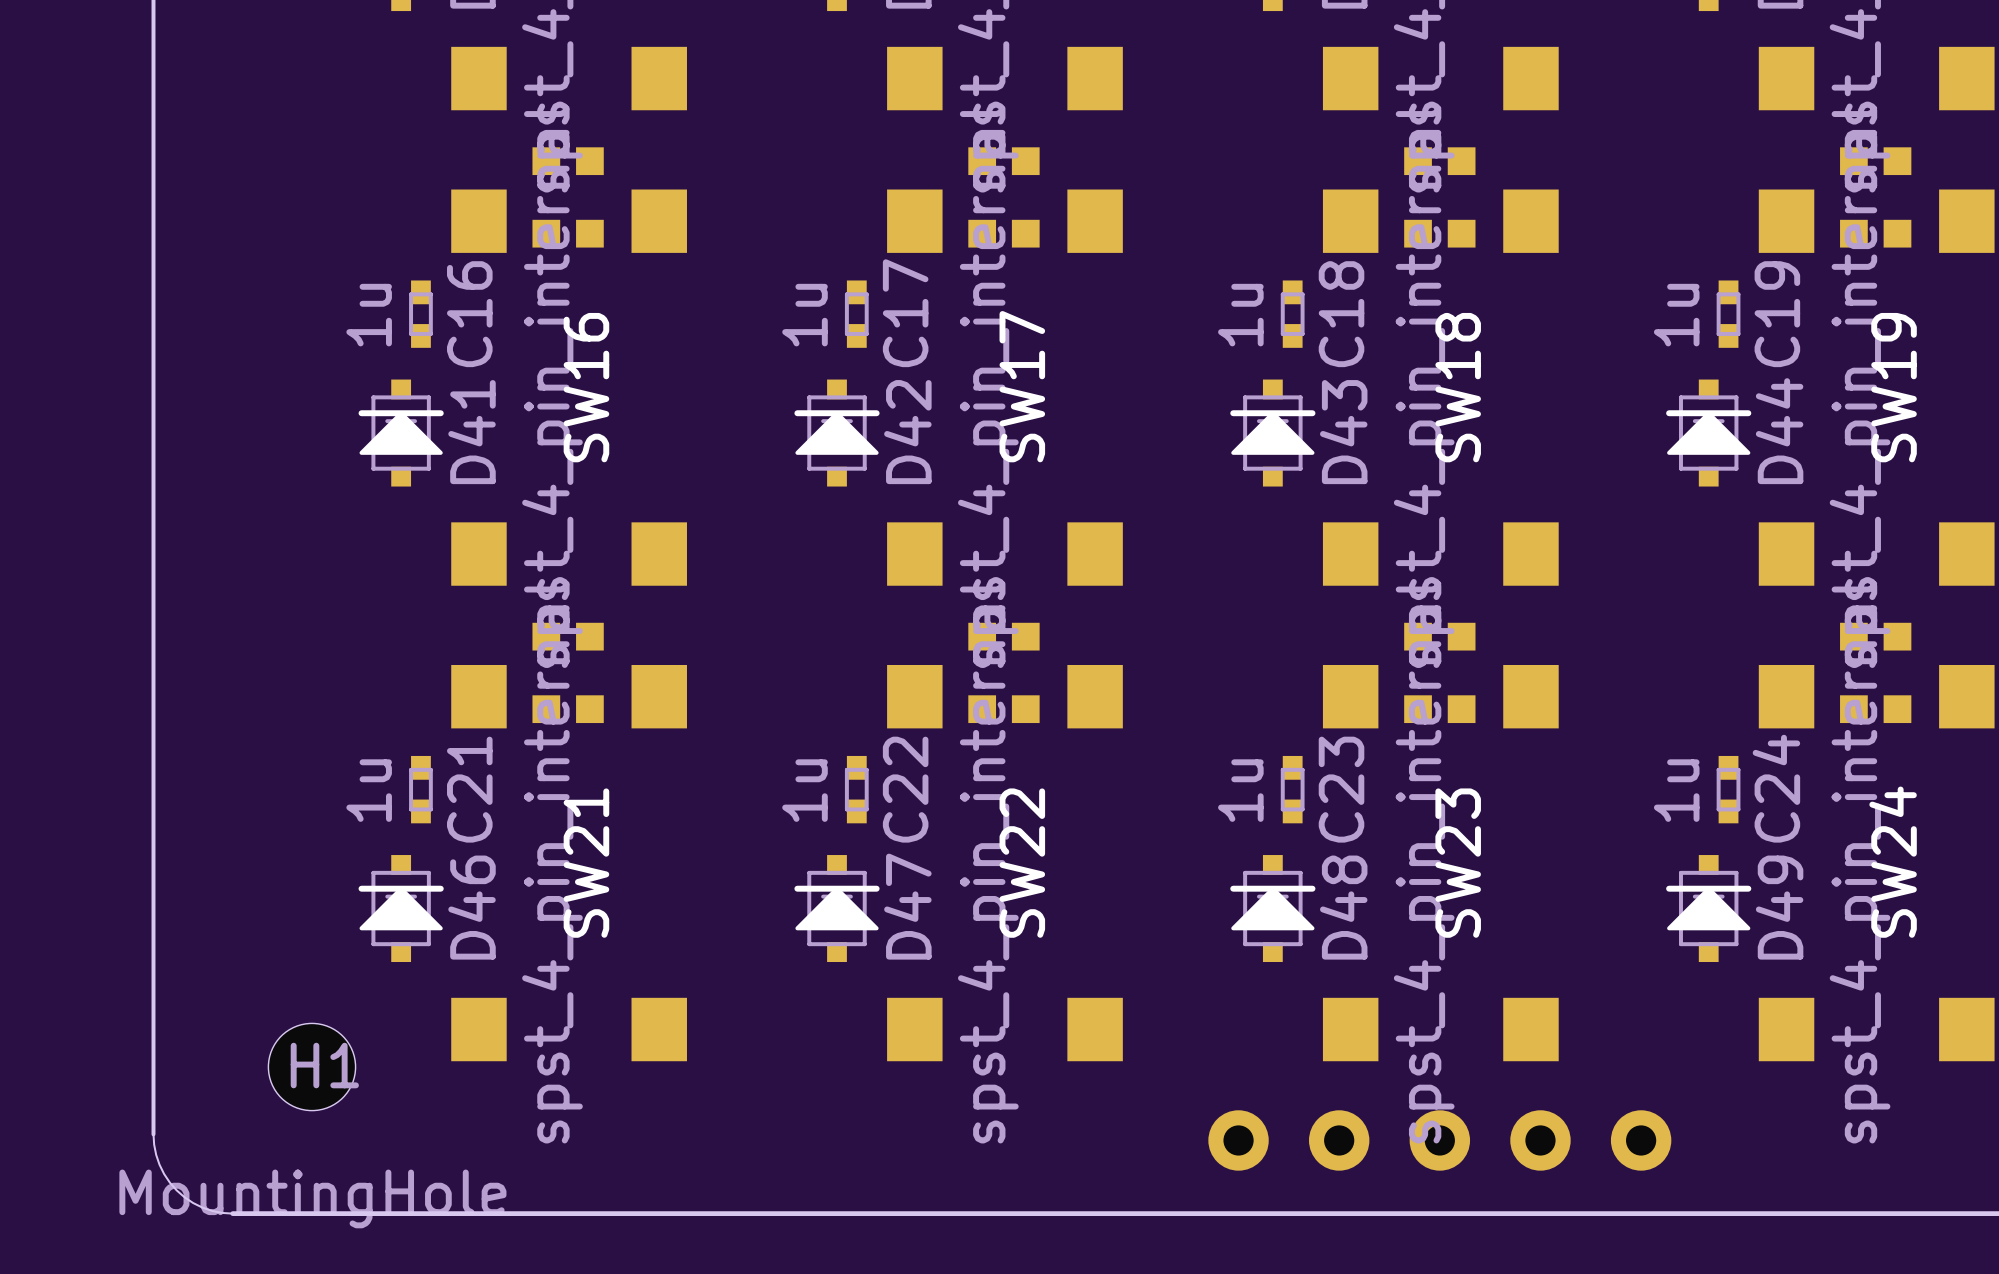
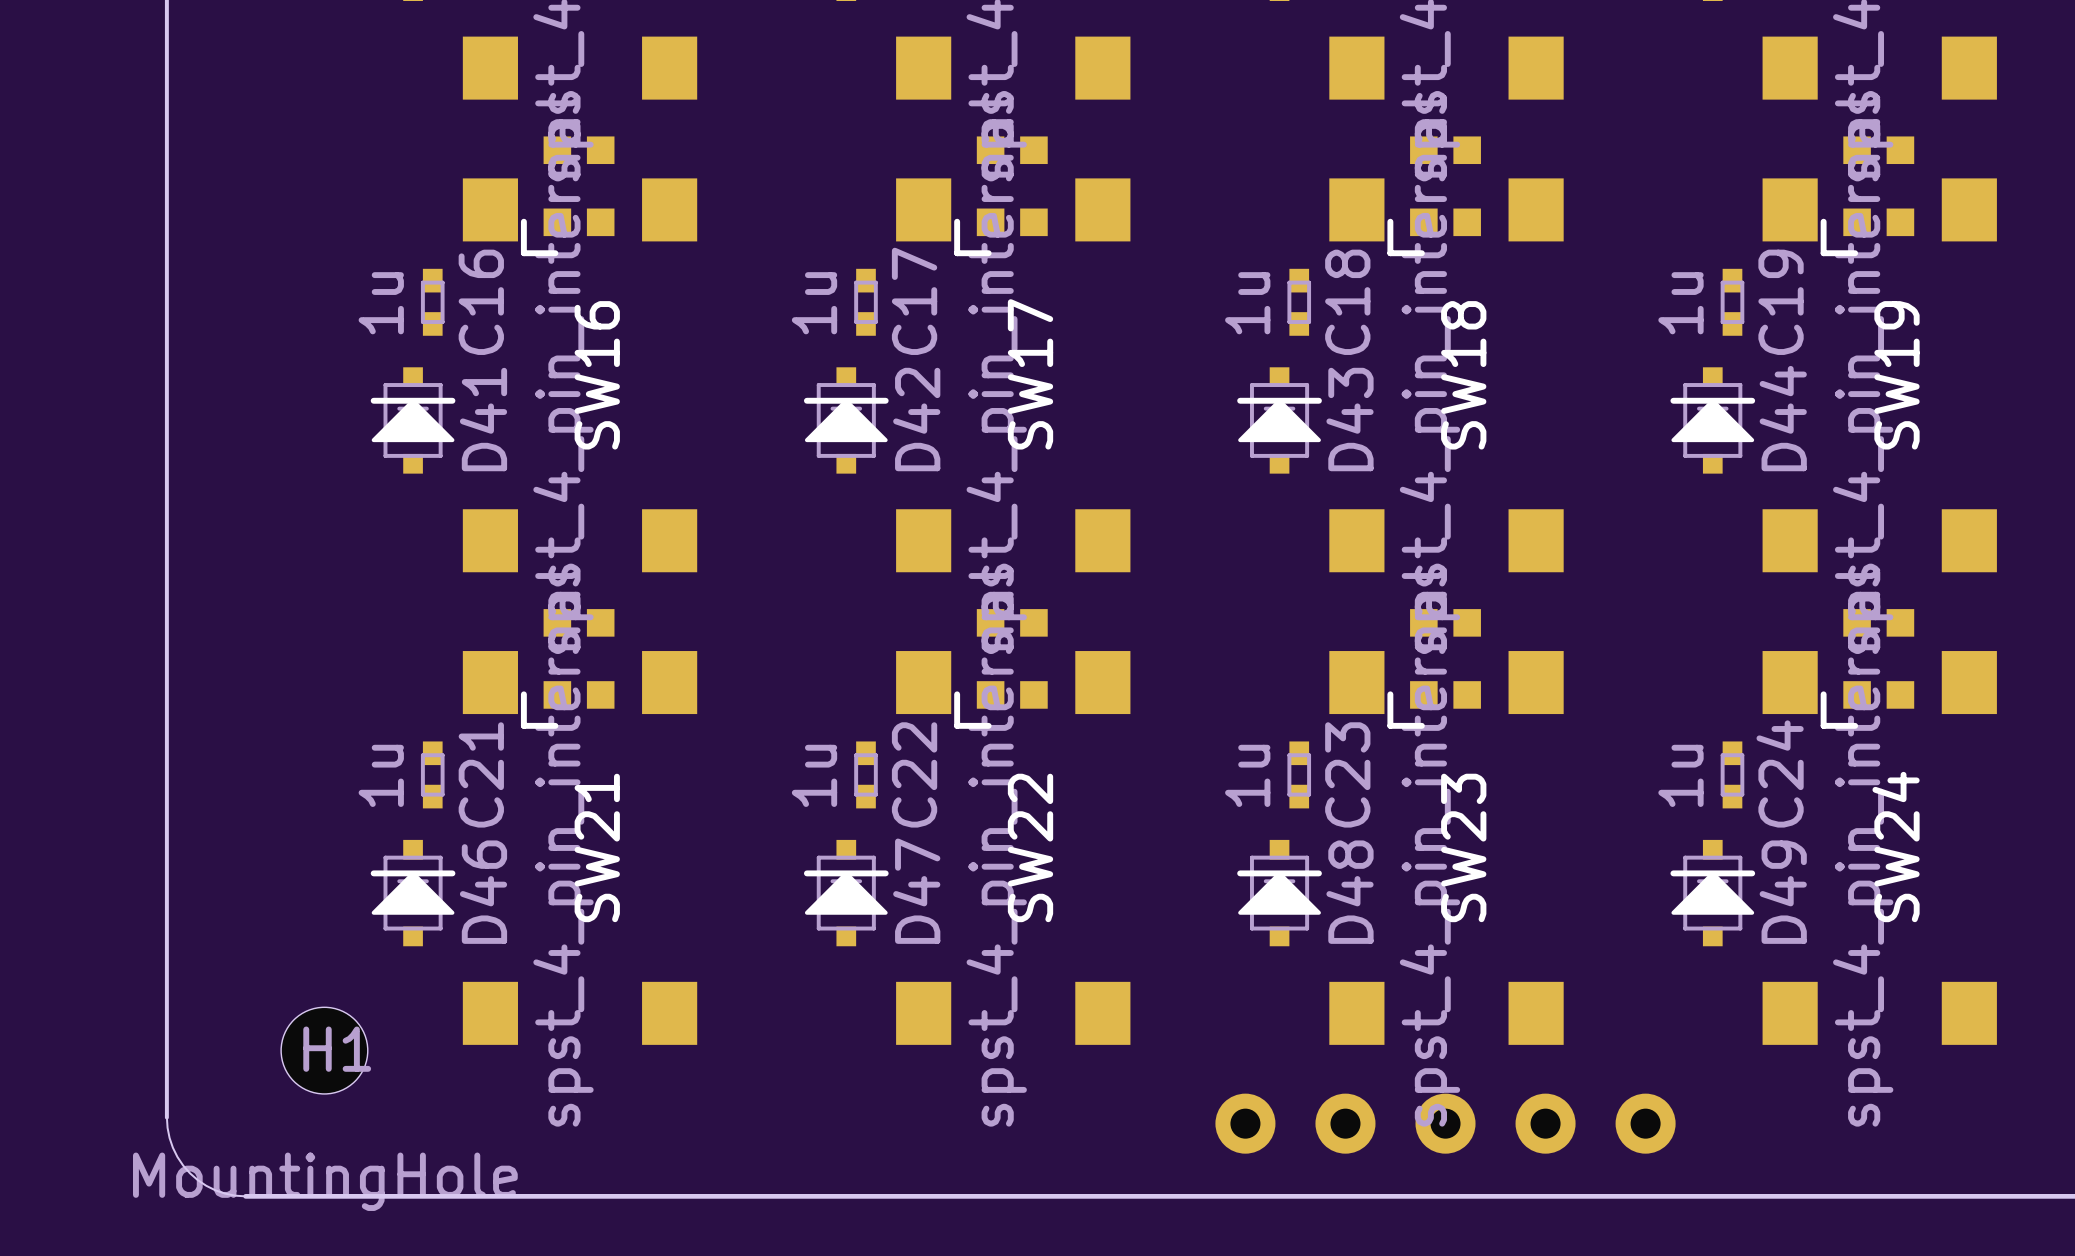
part footprint: [532, 147, 604, 248] -> [520, 136, 615, 257]
part footprint: [968, 147, 1040, 248] -> [954, 136, 1048, 257]
part footprint: [1404, 147, 1476, 248] -> [1387, 136, 1481, 257]
part footprint: [1840, 147, 1912, 248] -> [1820, 136, 1915, 257]
part footprint: [532, 622, 604, 724] -> [520, 609, 615, 729]
part footprint: [968, 622, 1040, 724] -> [954, 609, 1048, 729]
part footprint: [1404, 622, 1476, 724] -> [1387, 609, 1481, 729]
part footprint: [1840, 622, 1912, 724] -> [1820, 609, 1915, 729]

